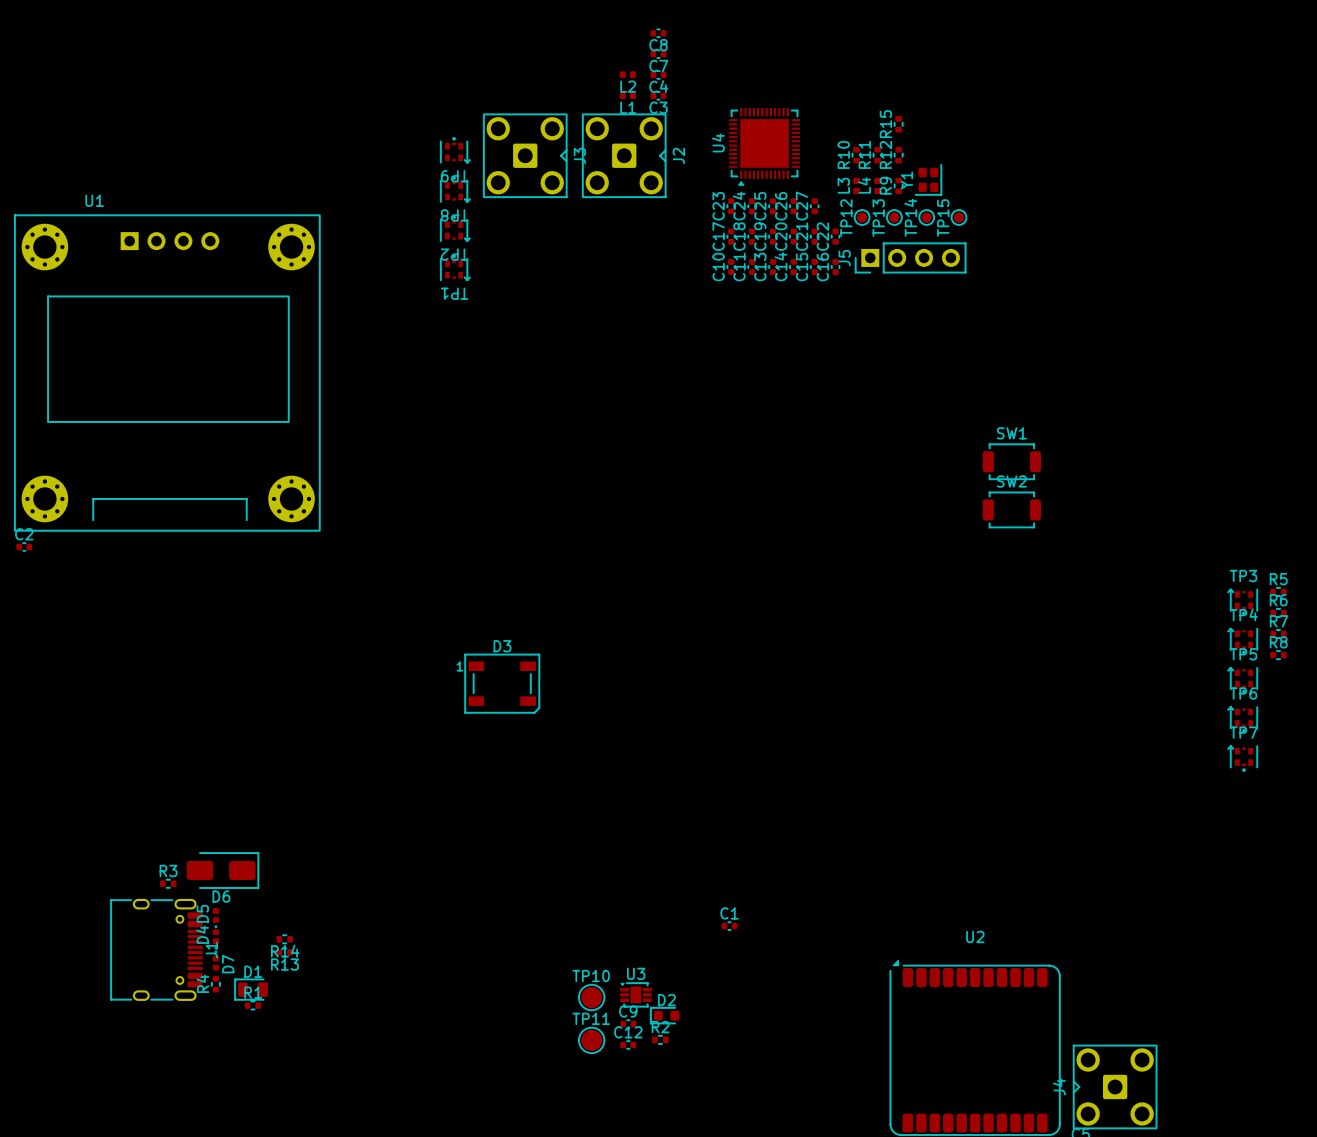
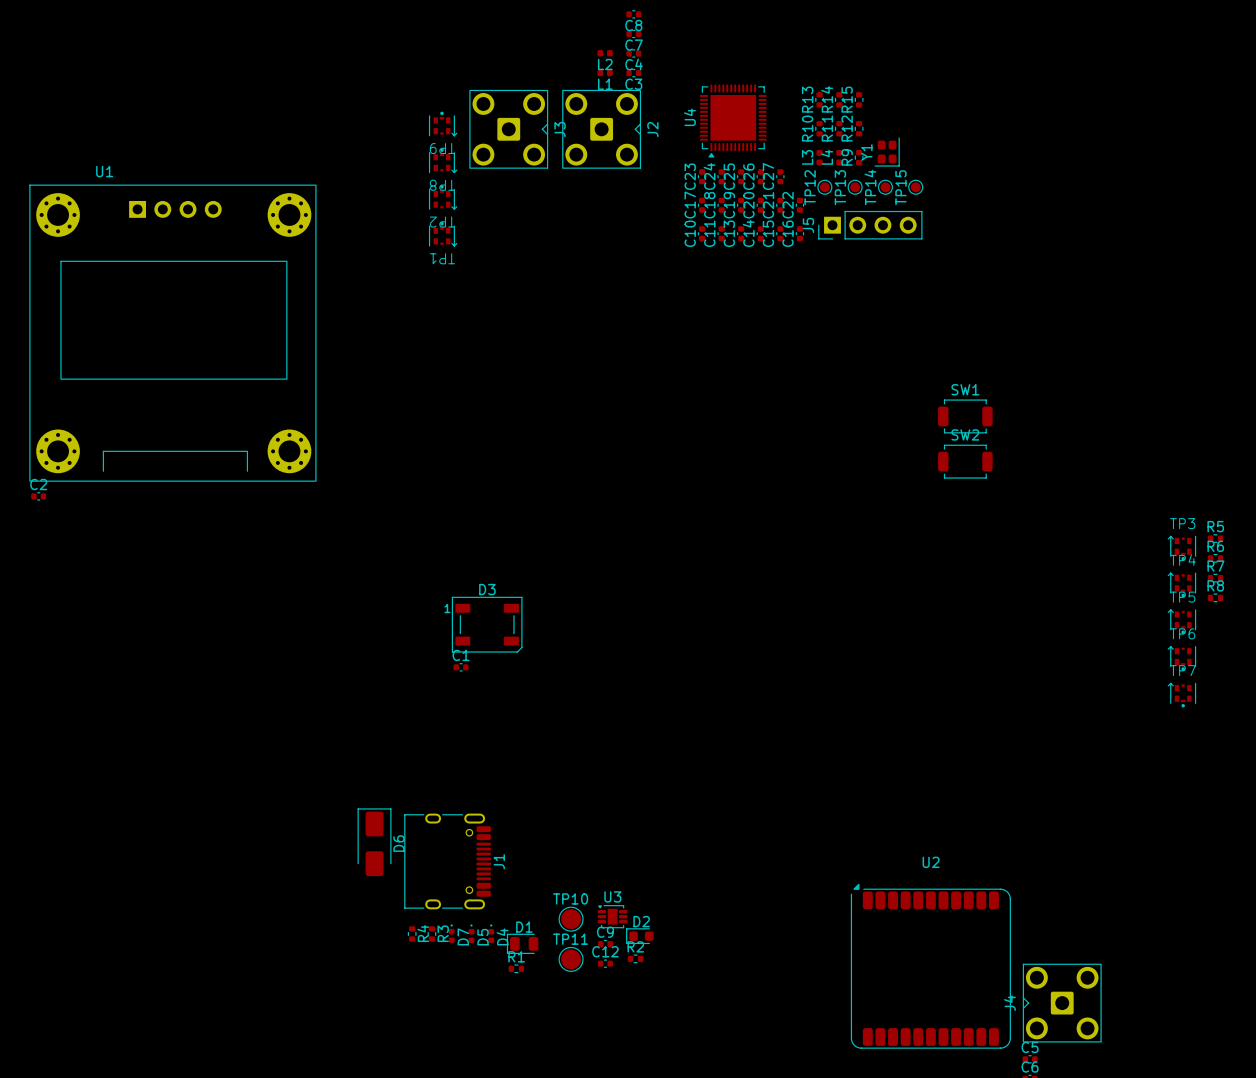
D6 rotation: 0° (222, 870) -> 90° counterclockwise (374, 842)
D6 position: (222, 870) -> (374, 842)
R3 rotation: 0° (168, 883) -> 90° clockwise (431, 933)
R3 position: (168, 883) -> (431, 933)
D5 rotation: 0° (215, 917) -> 180° (471, 933)
D5 position: (215, 917) -> (471, 933)
C1 position: (729, 926) -> (461, 667)
D4 rotation: 0° (215, 939) -> 180° (491, 933)
D4 position: (215, 939) -> (491, 933)
R14 rotation: 0° (284, 939) -> 90° clockwise (839, 99)
R14 position: (284, 939) -> (839, 99)
J1 position: (156, 949) -> (447, 861)
R13 rotation: 0° (284, 952) -> 90° clockwise (819, 99)
R13 position: (284, 952) -> (819, 99)
D7 position: (215, 960) -> (451, 933)
R4 name position: R4 (202, 983) -> R4 (423, 933)
R4 position: (215, 984) -> (412, 933)
D1 position: (251, 989) -> (522, 943)
R1 position: (252, 1005) -> (516, 968)

